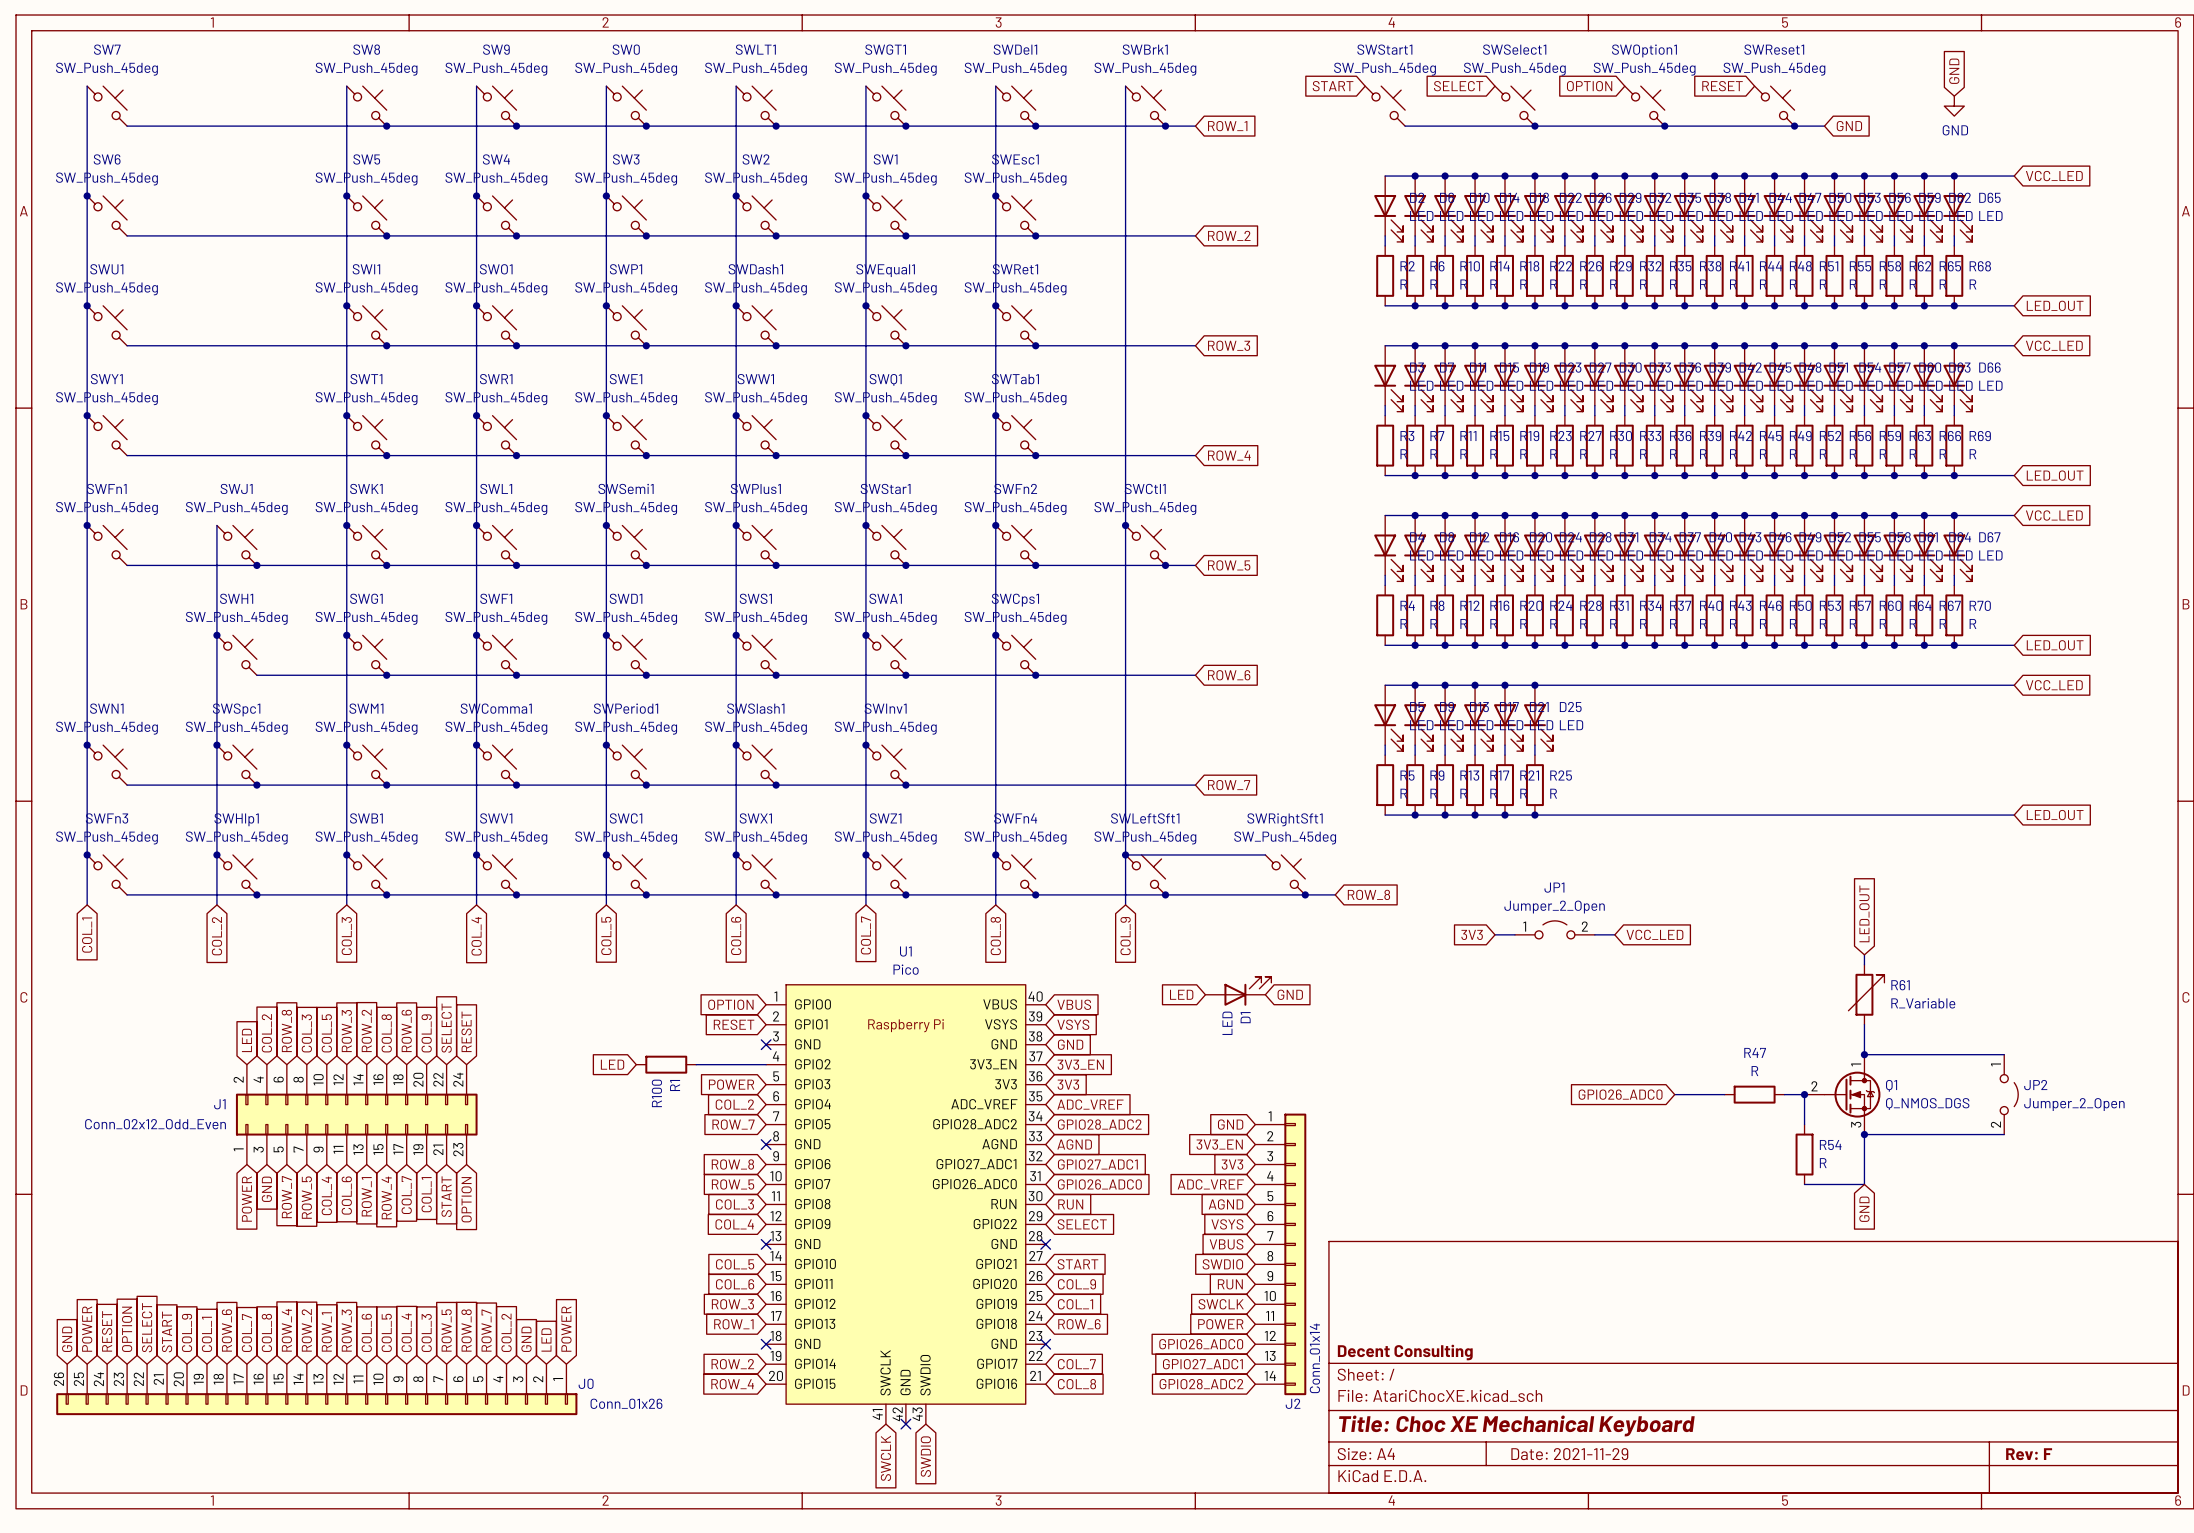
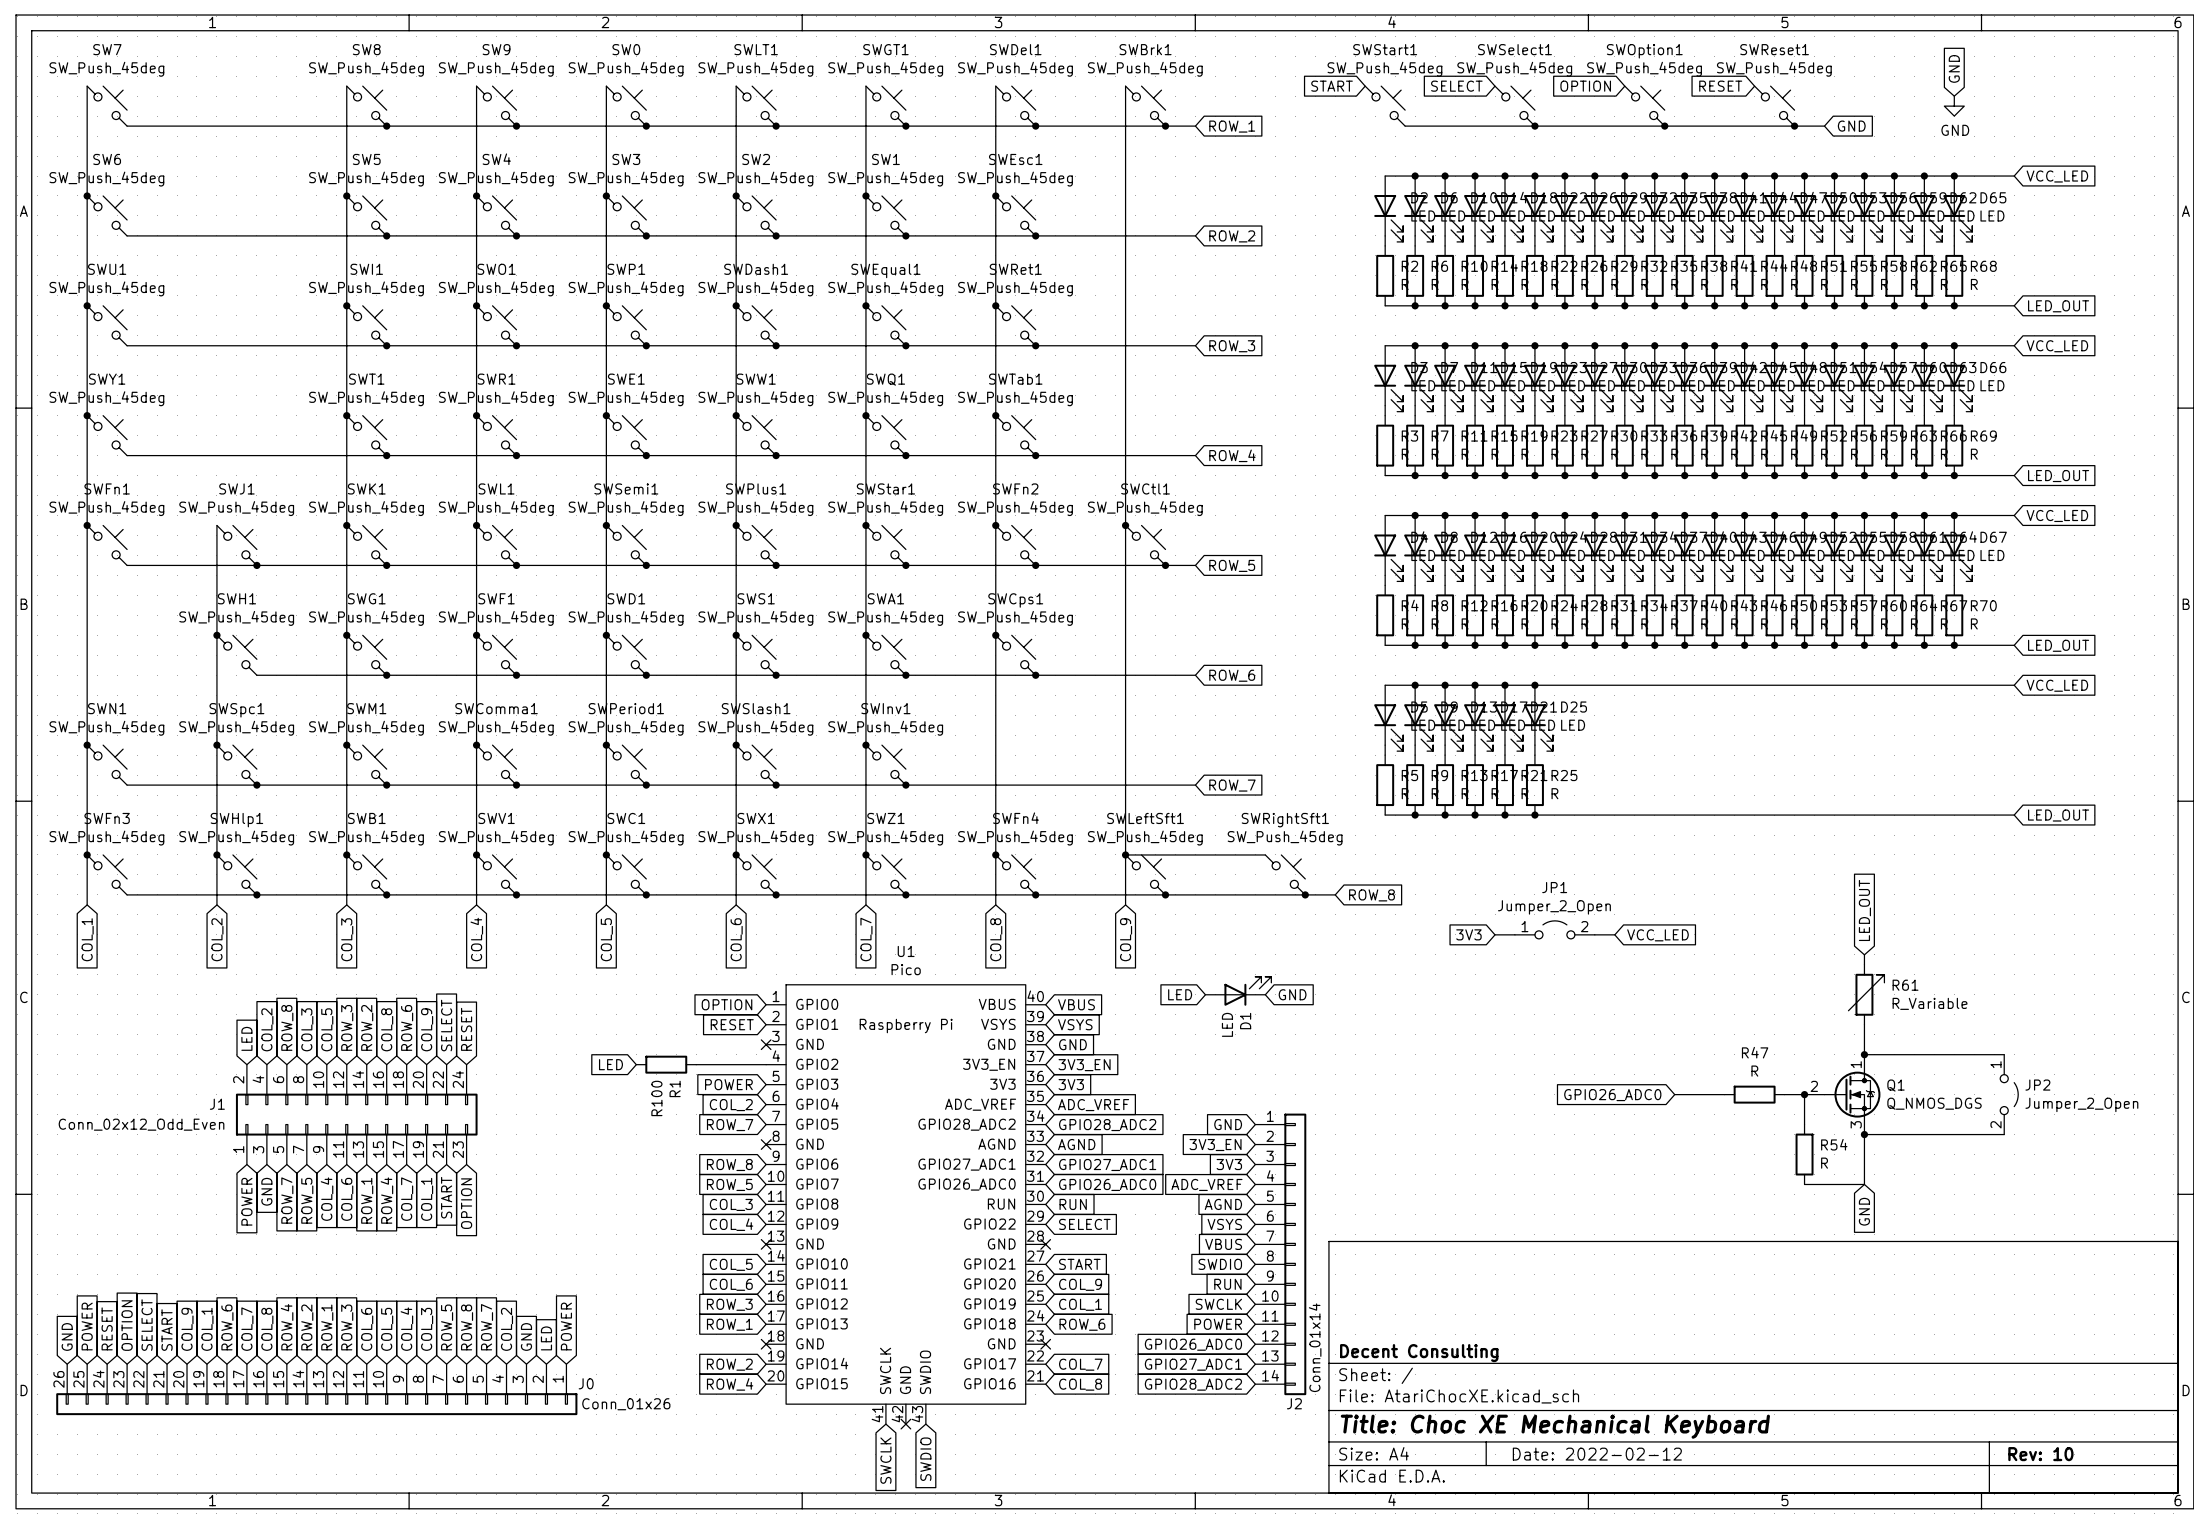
title block: Date: 2021-11-29 (1569, 1454) -> Date: 2022-02-12 (1597, 1454)
title block: Rev: F (2029, 1454) -> Rev: 10 (2040, 1454)

